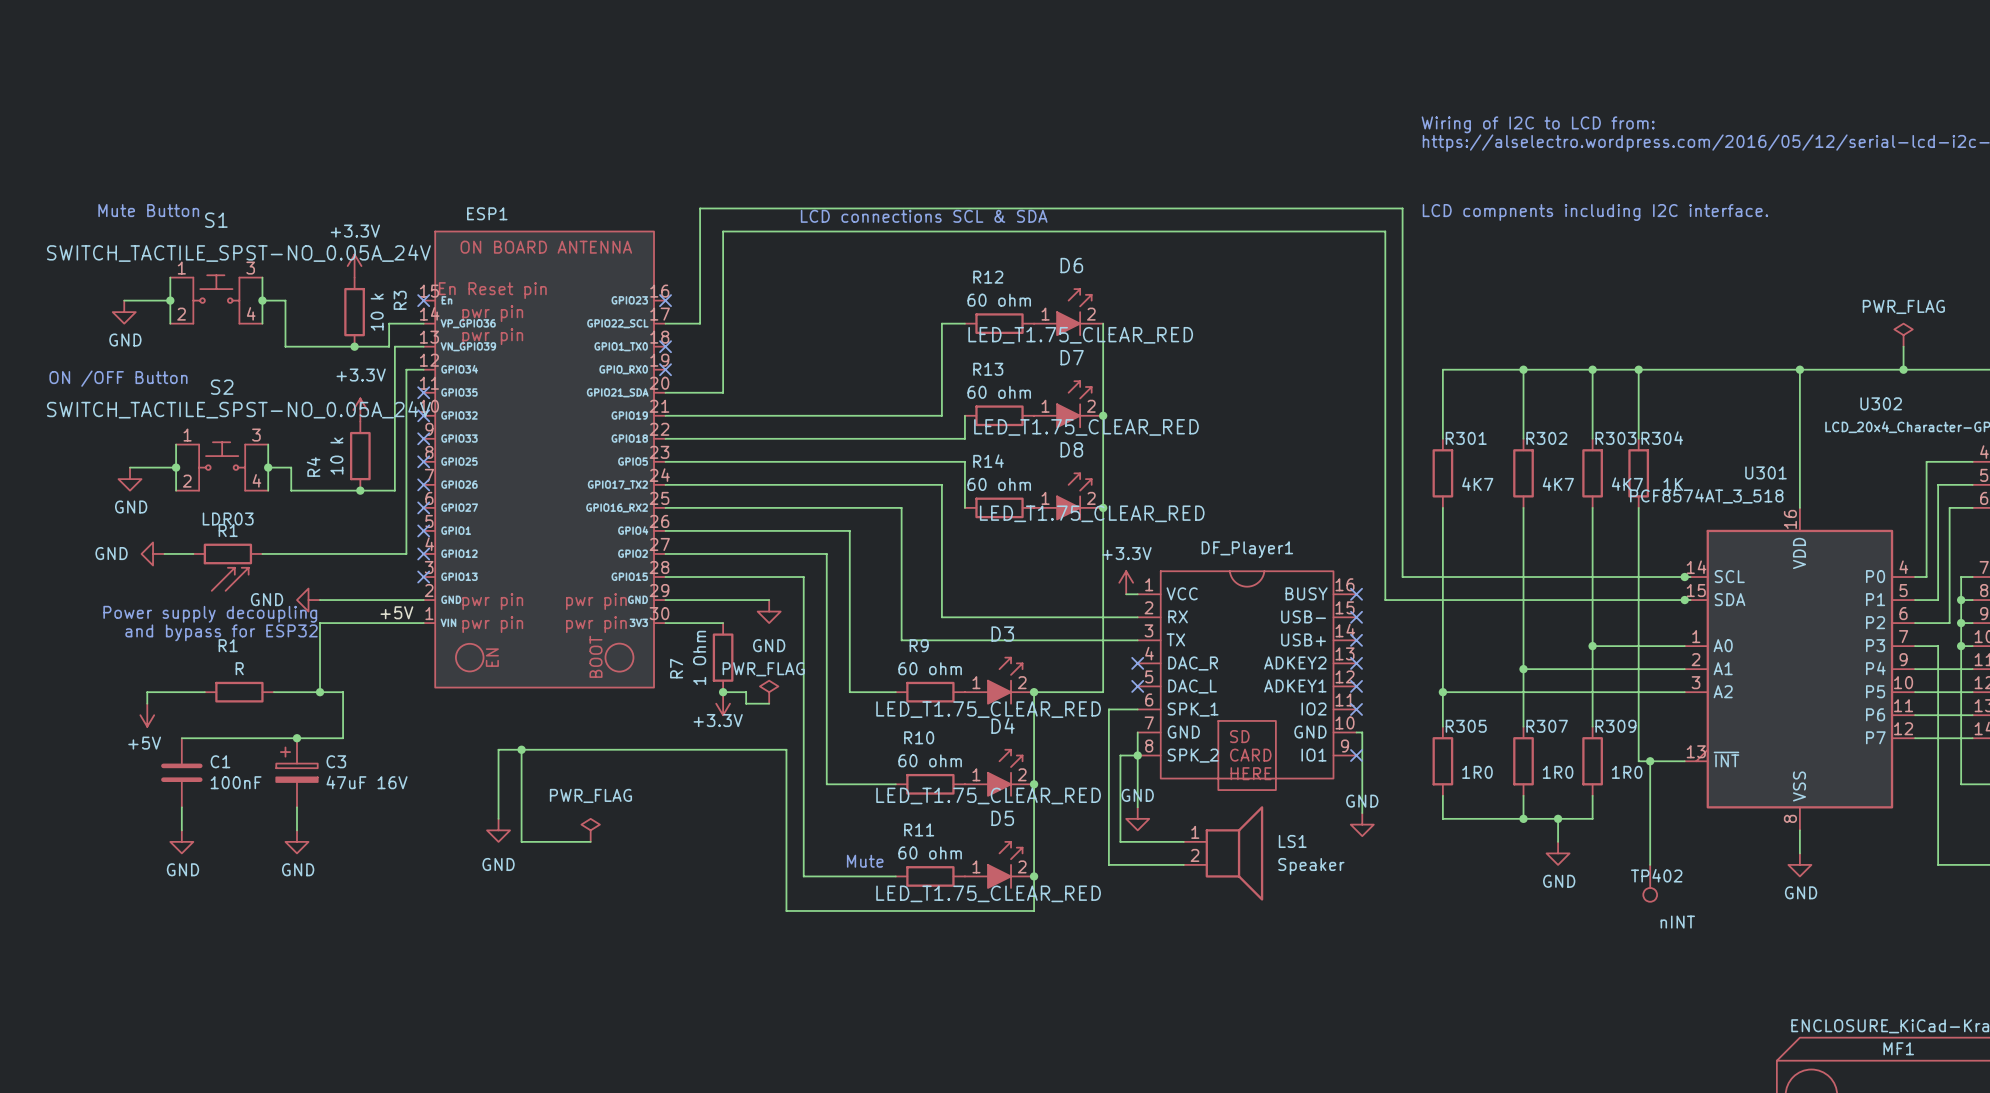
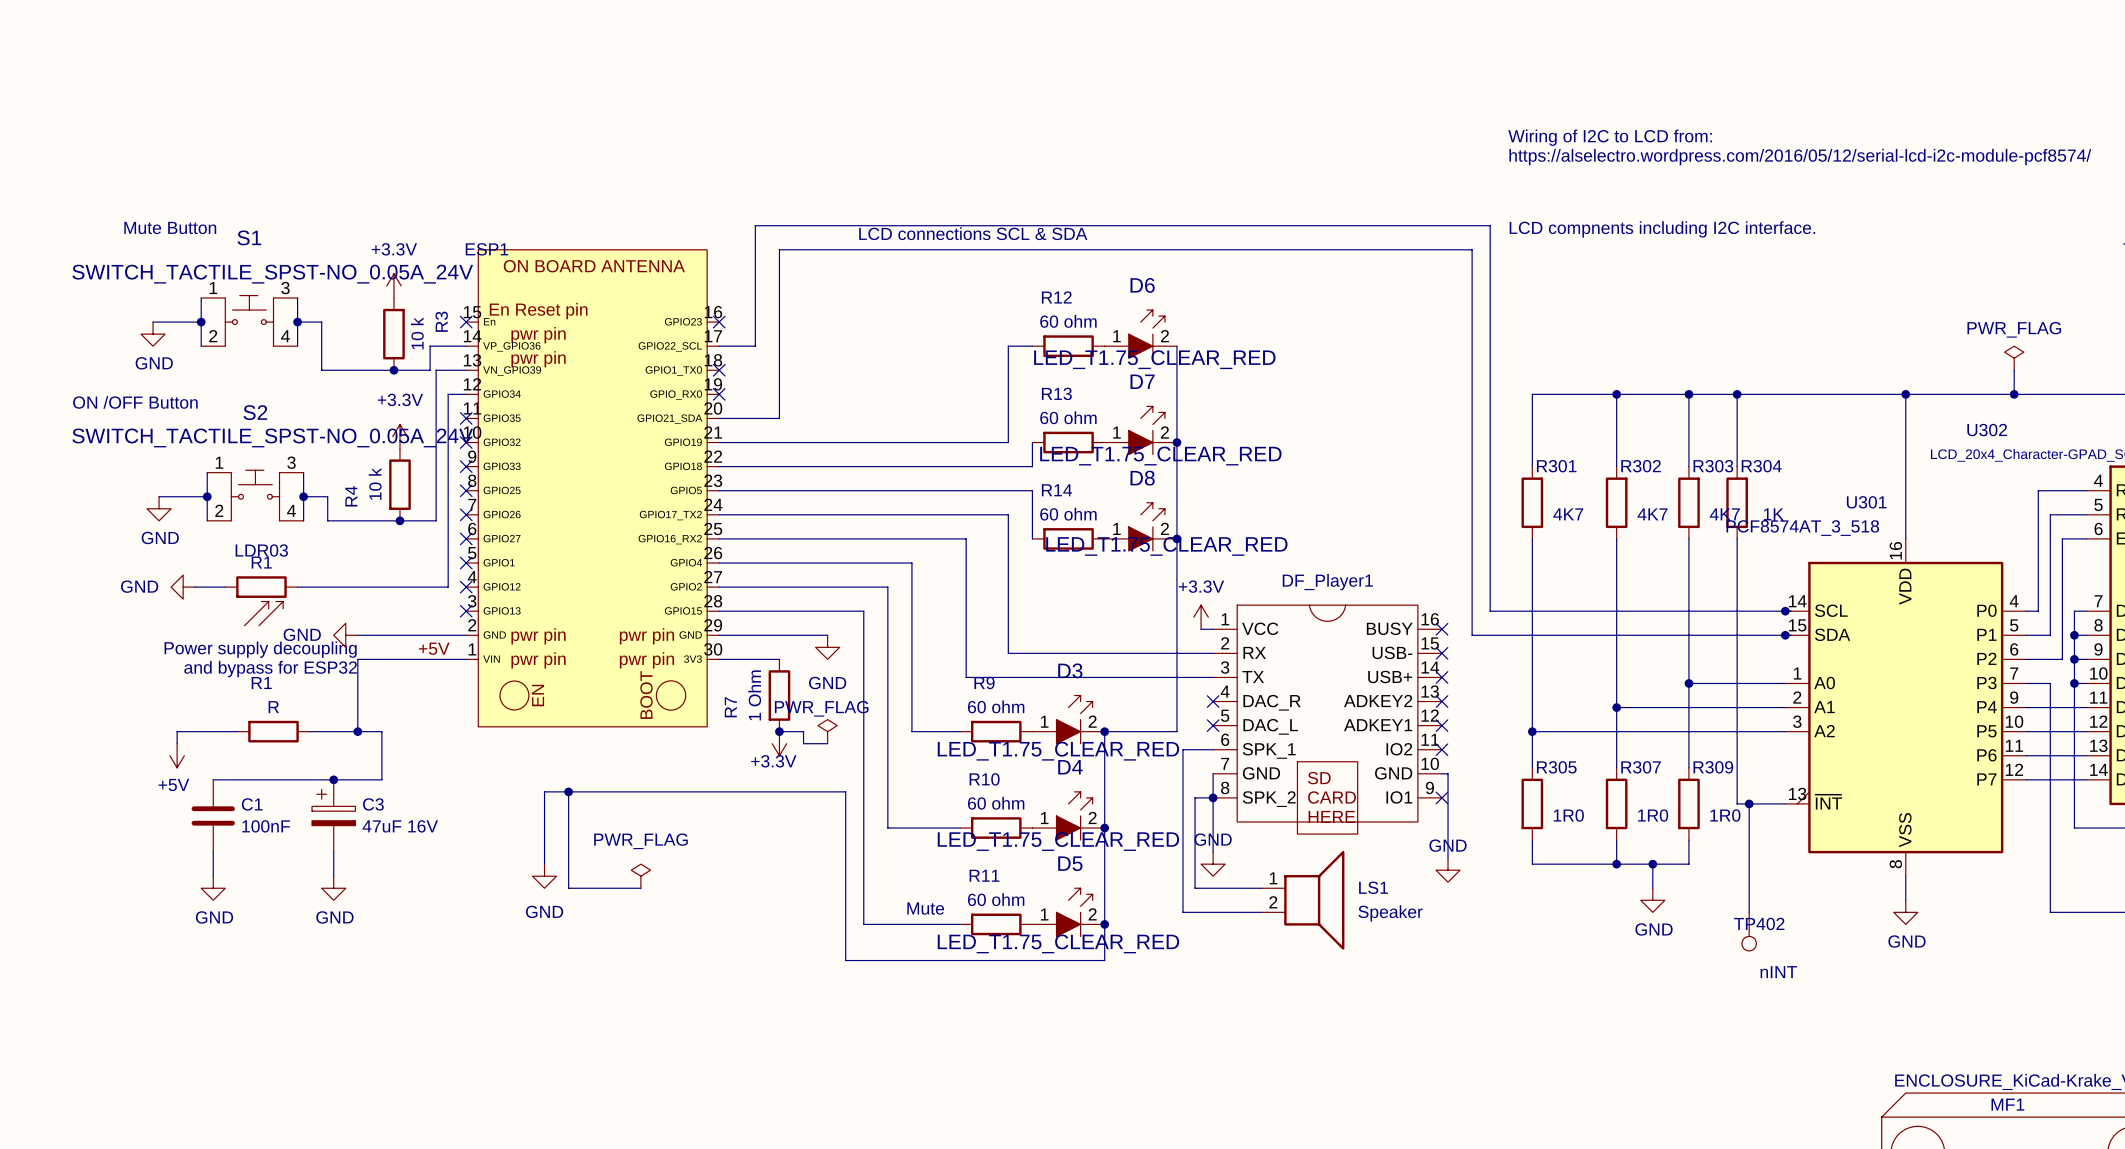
ESP1 name position: ESP1 (487, 213) -> ESP1 (487, 249)

